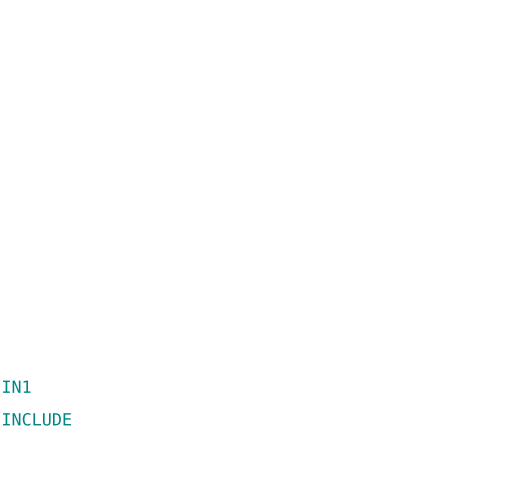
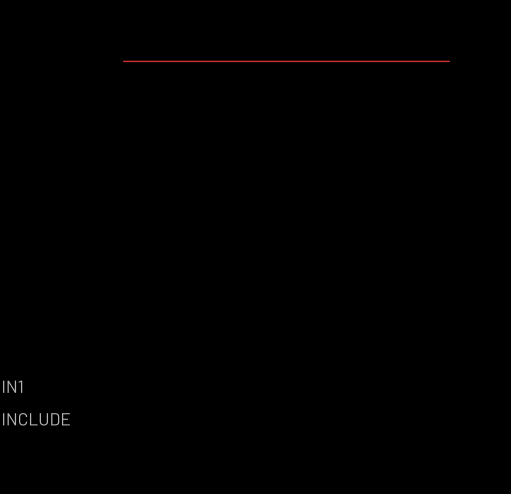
part: none -> (286, 61)

